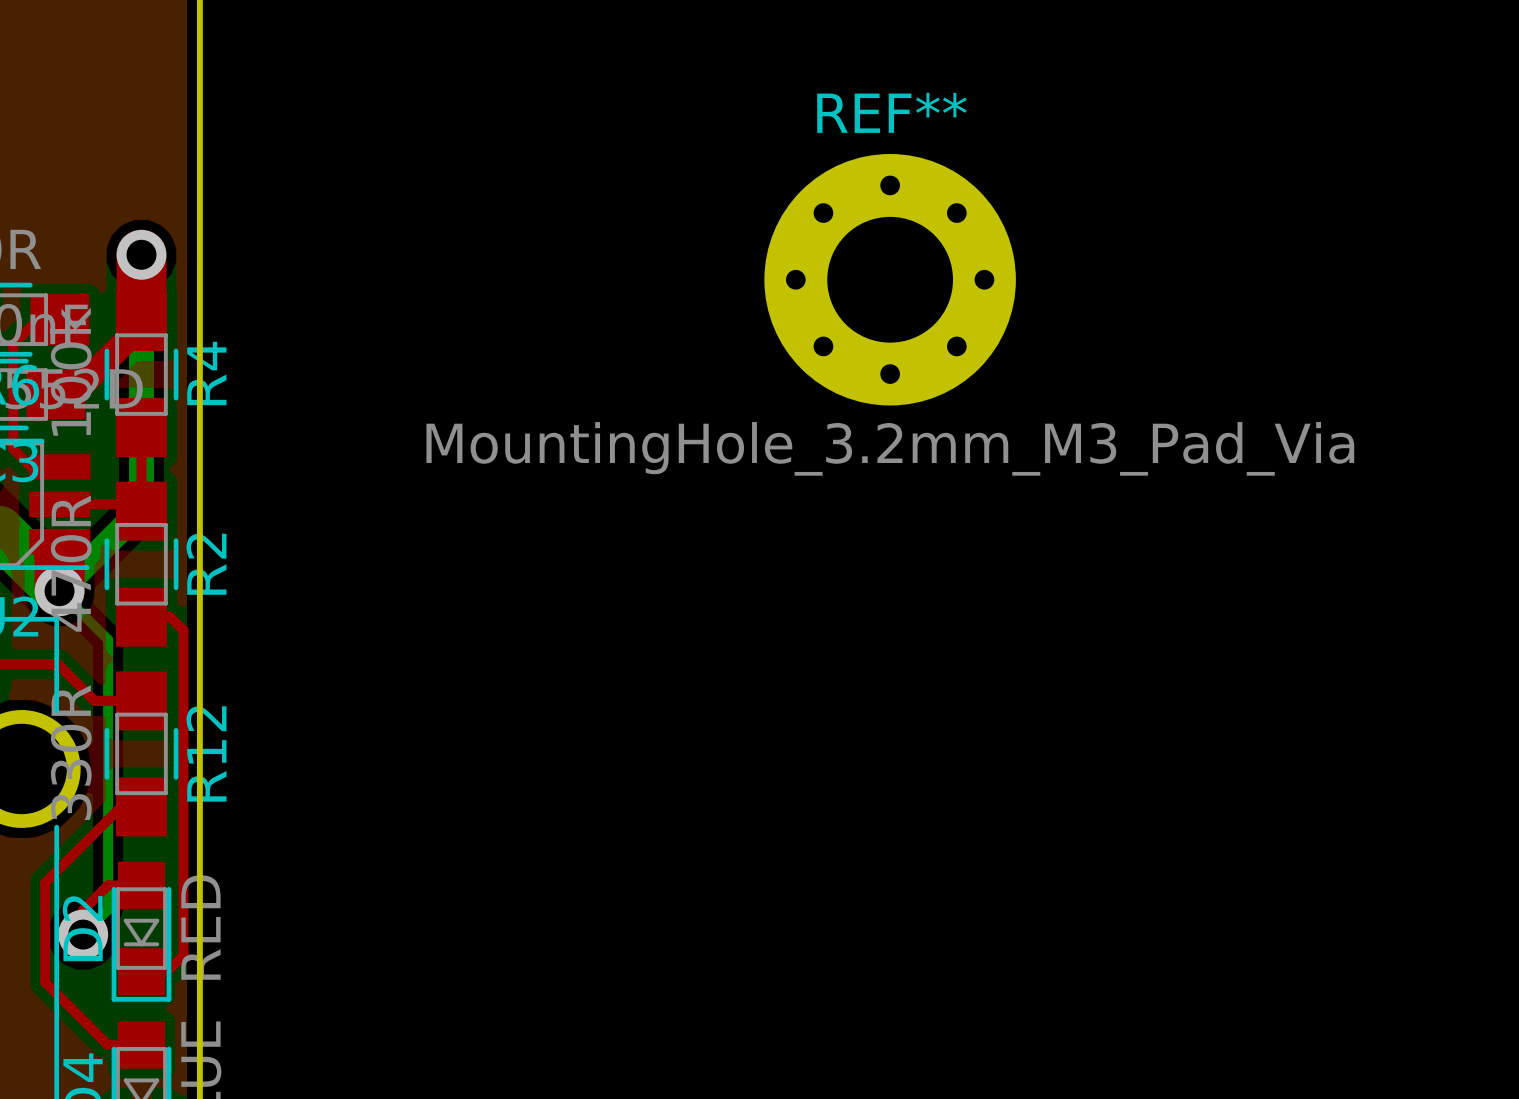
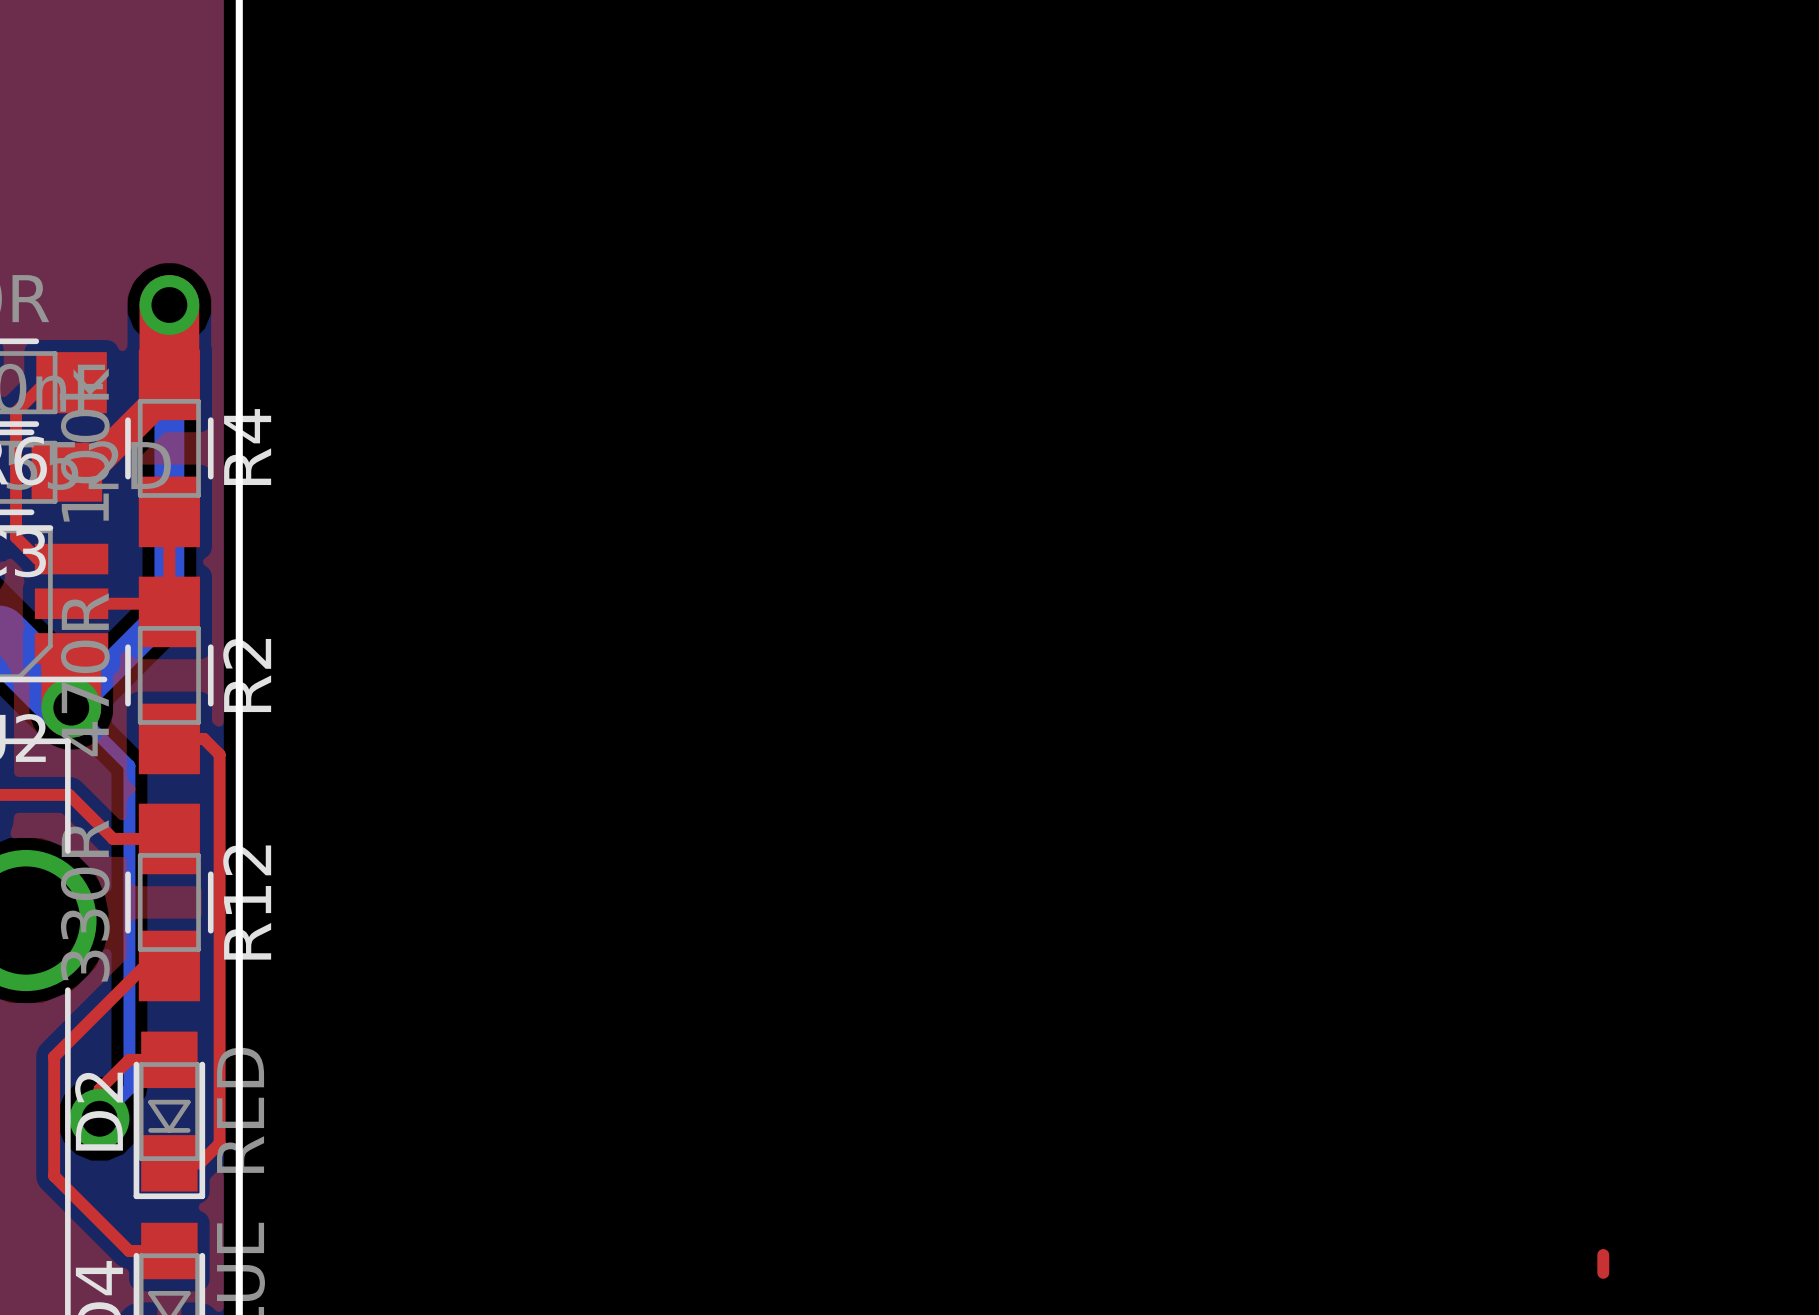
REF**: MountingHole_3.2mm_M3_Pad_Via (890, 279) -> none
top track: none -> (1603, 1254) (1603, 1272)

